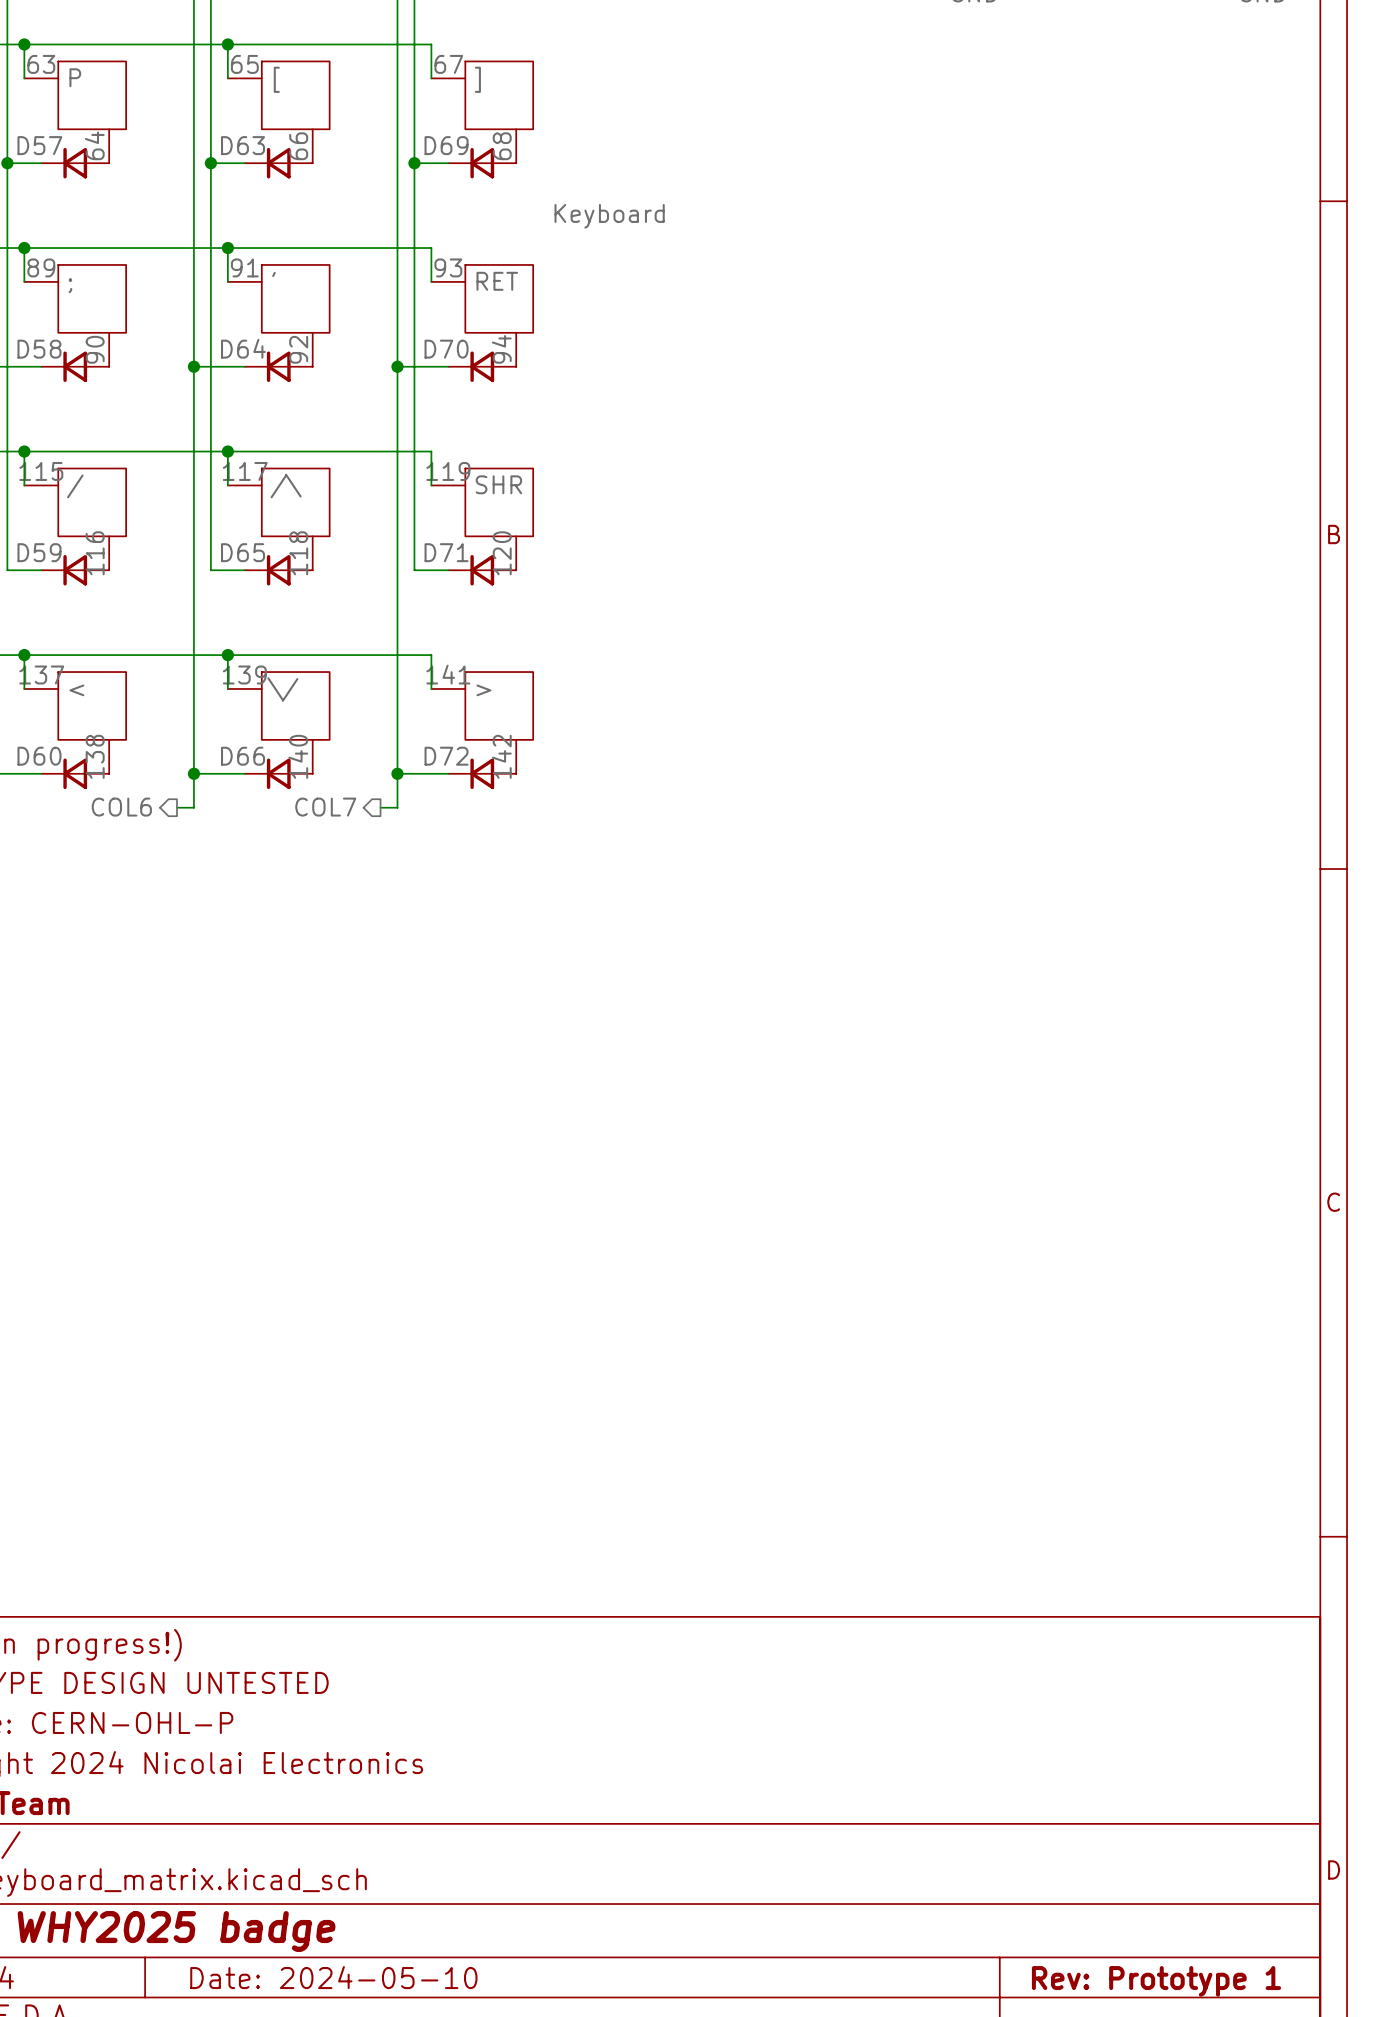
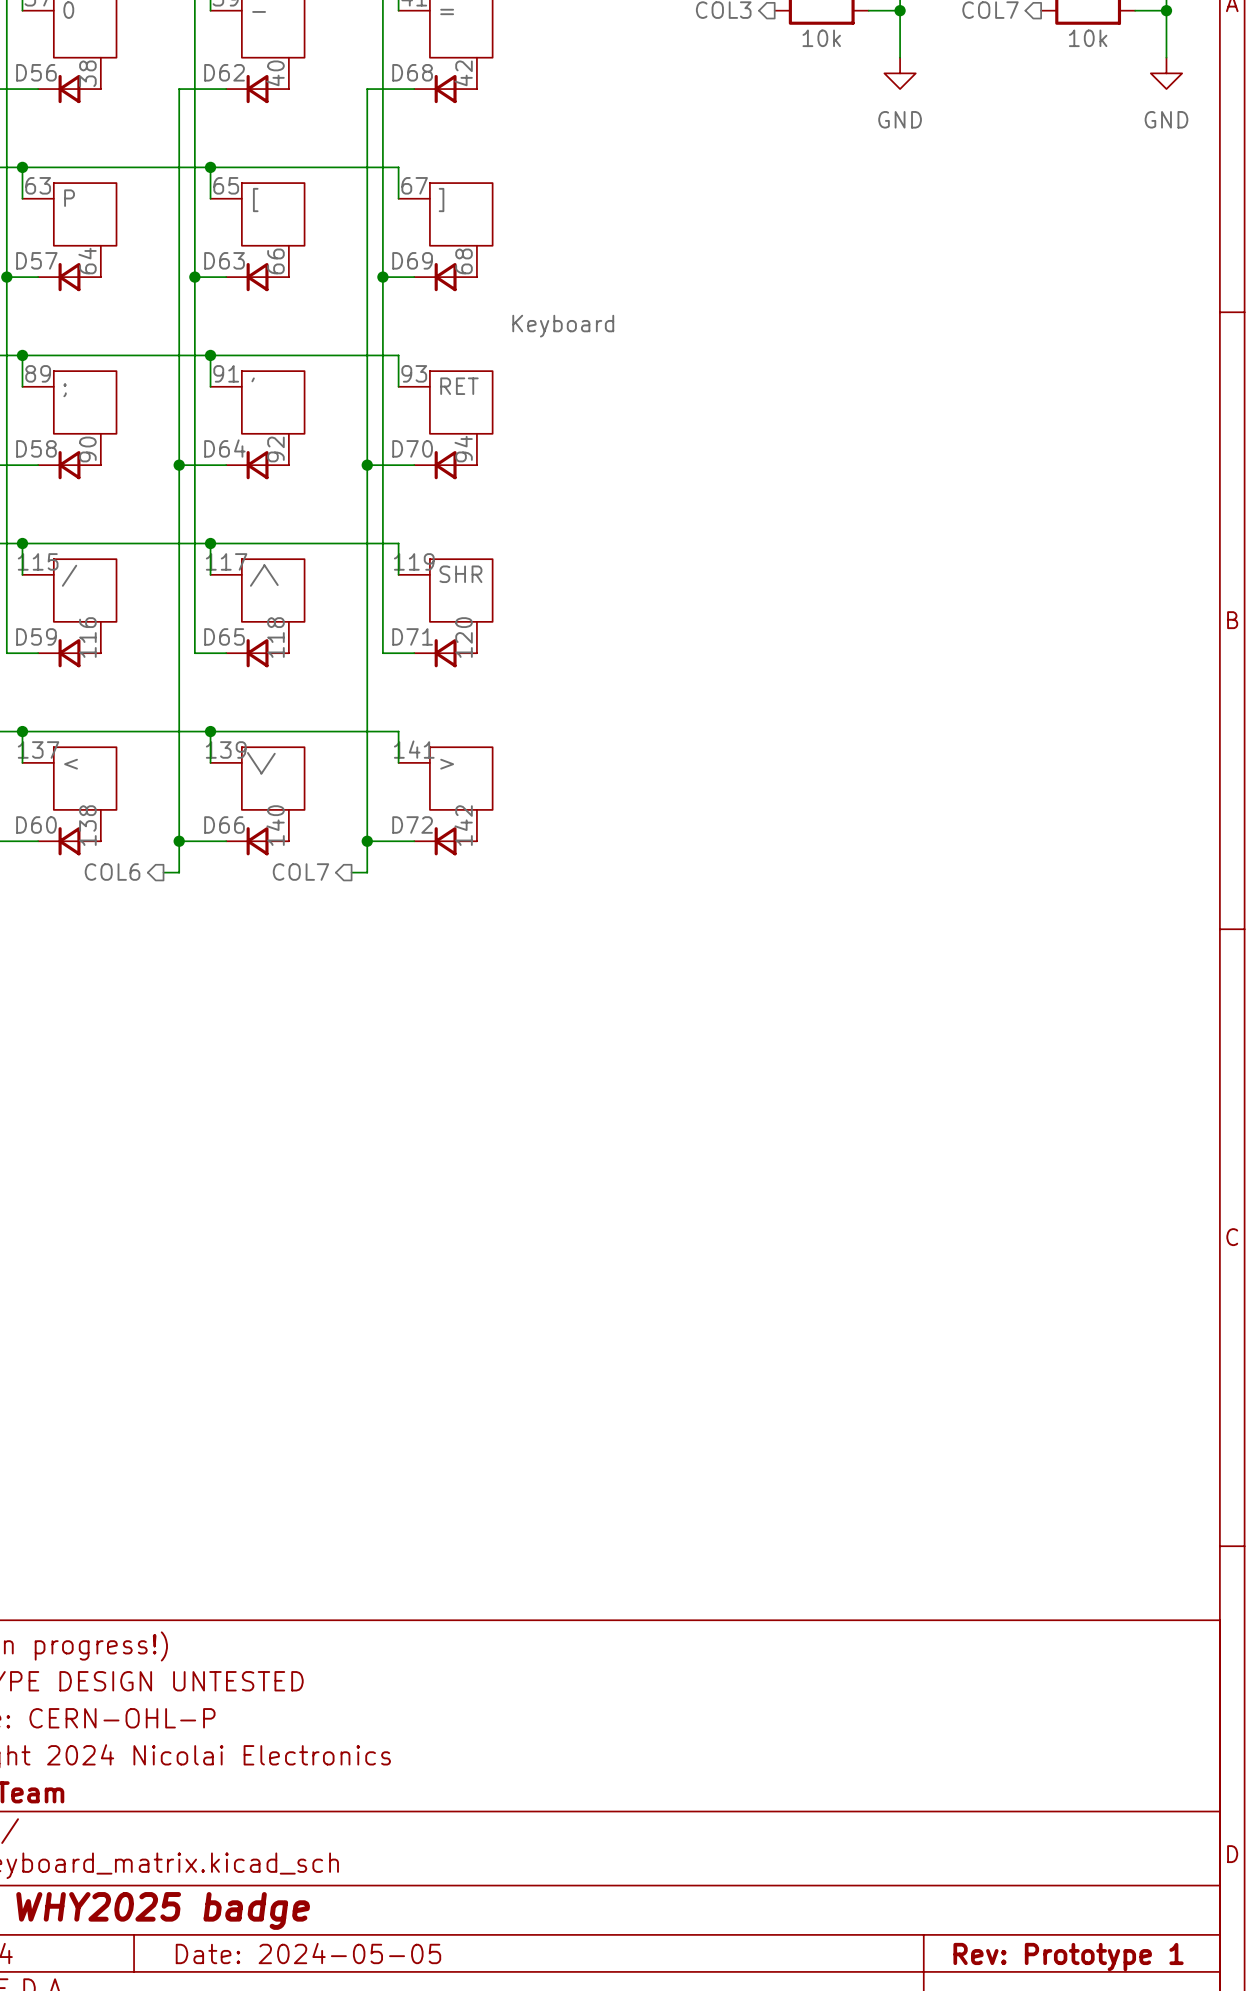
title block: Date: 2024-05-10 (333, 1977) -> Date: 2024-05-05 (308, 1953)

